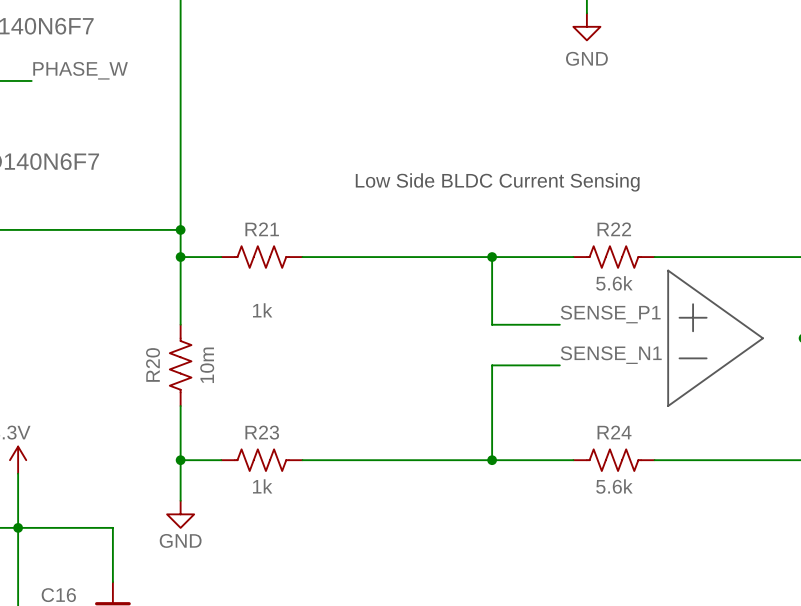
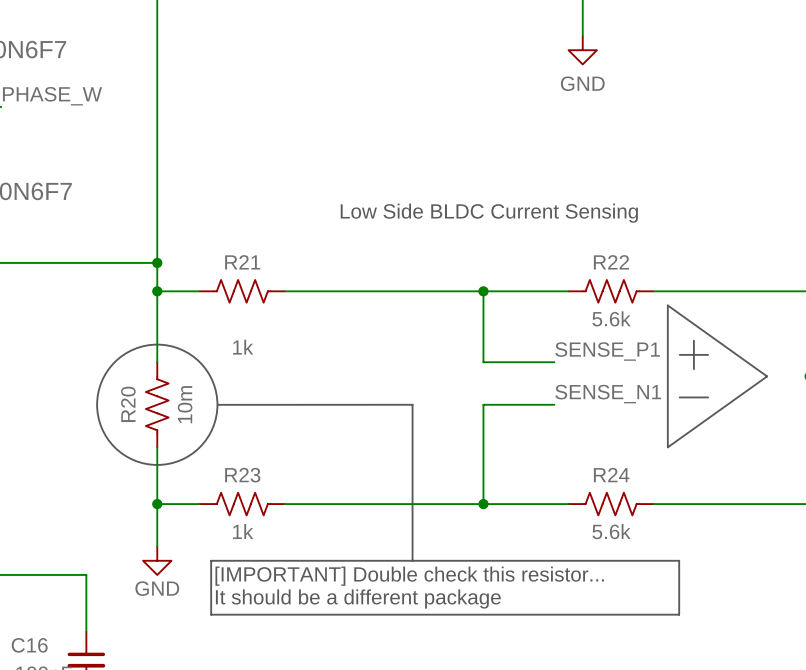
drawing: none -> [97, 344, 218, 465]
line: none -> (218, 404) (412, 404) (412, 560)
line: none -> (211, 560) (679, 560) (679, 614) (211, 614) (211, 560)
text: none -> [IMPORTANT] Double check this resistor... (409, 576)
text: none -> It should be a different package (358, 599)

